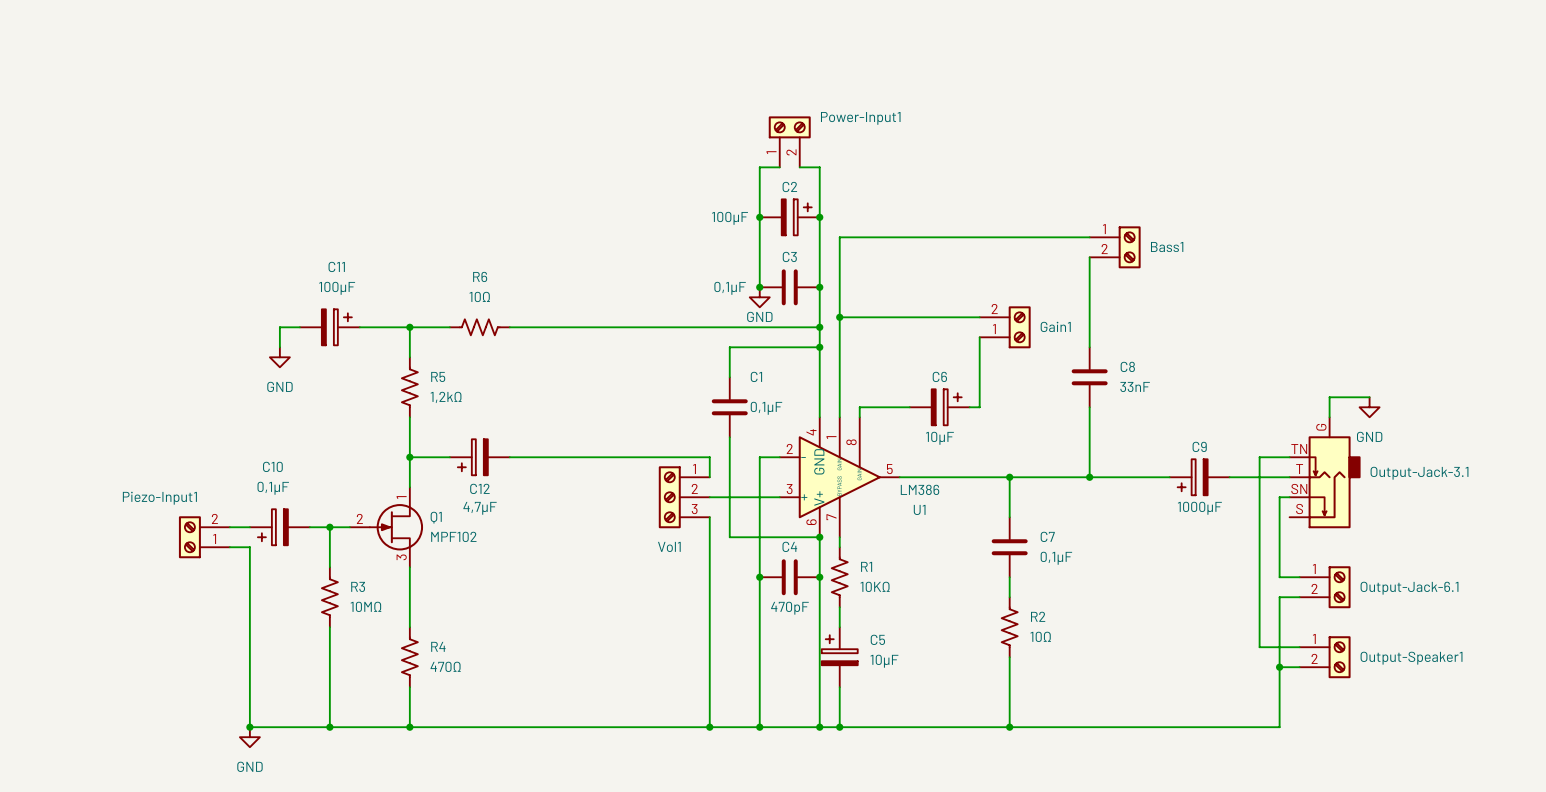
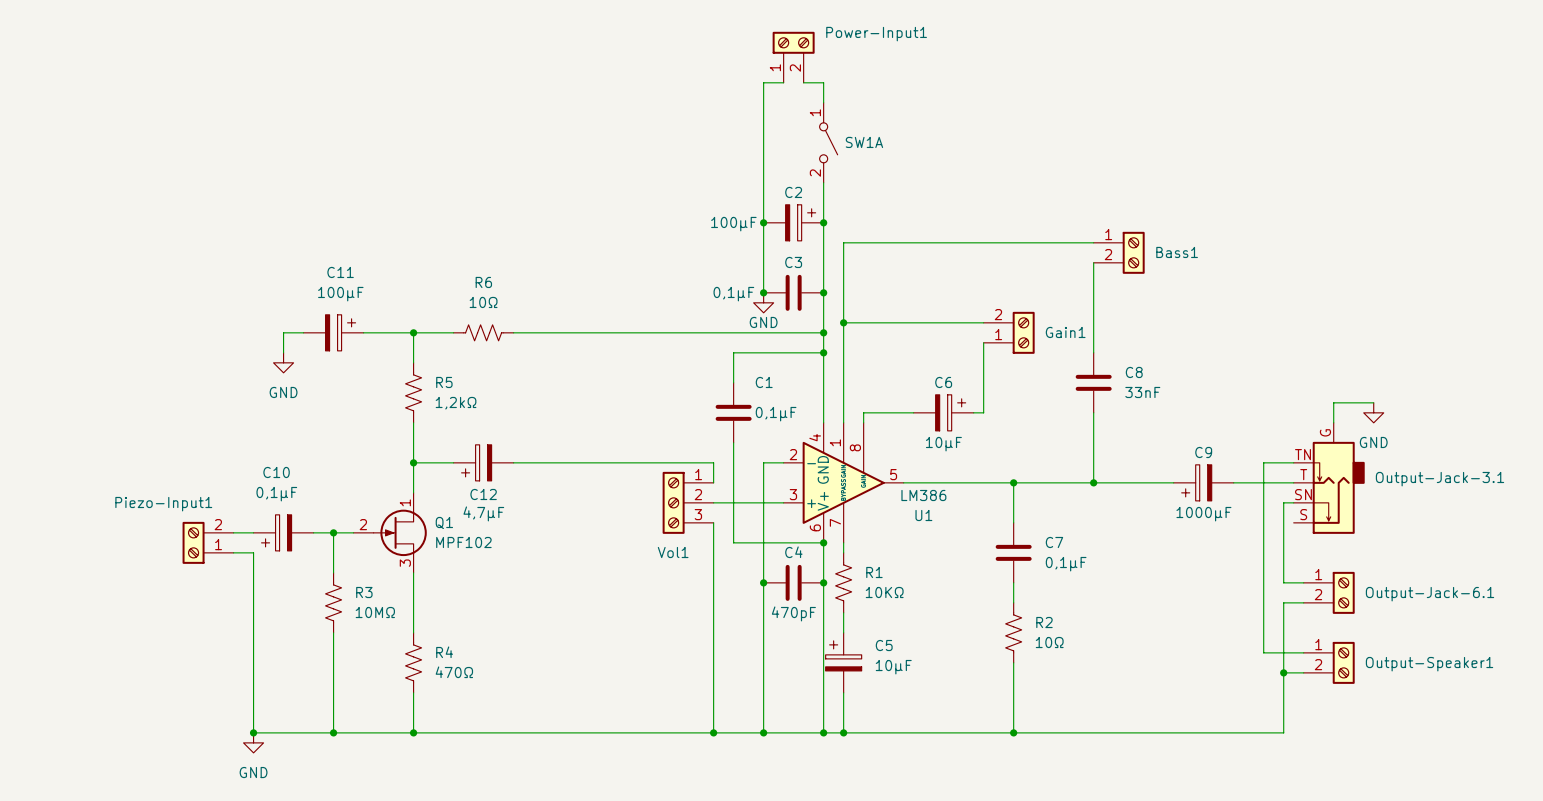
wire: none -> (803, 82) (823, 82) (823, 102)
SW1A: none -> (828, 142)
Power-Input1 position: (789, 141) -> (793, 57)
wire: (759, 167) (779, 167) -> (763, 172) (763, 82) (783, 82)
wire: (799, 167) (819, 167) (819, 177) -> none

